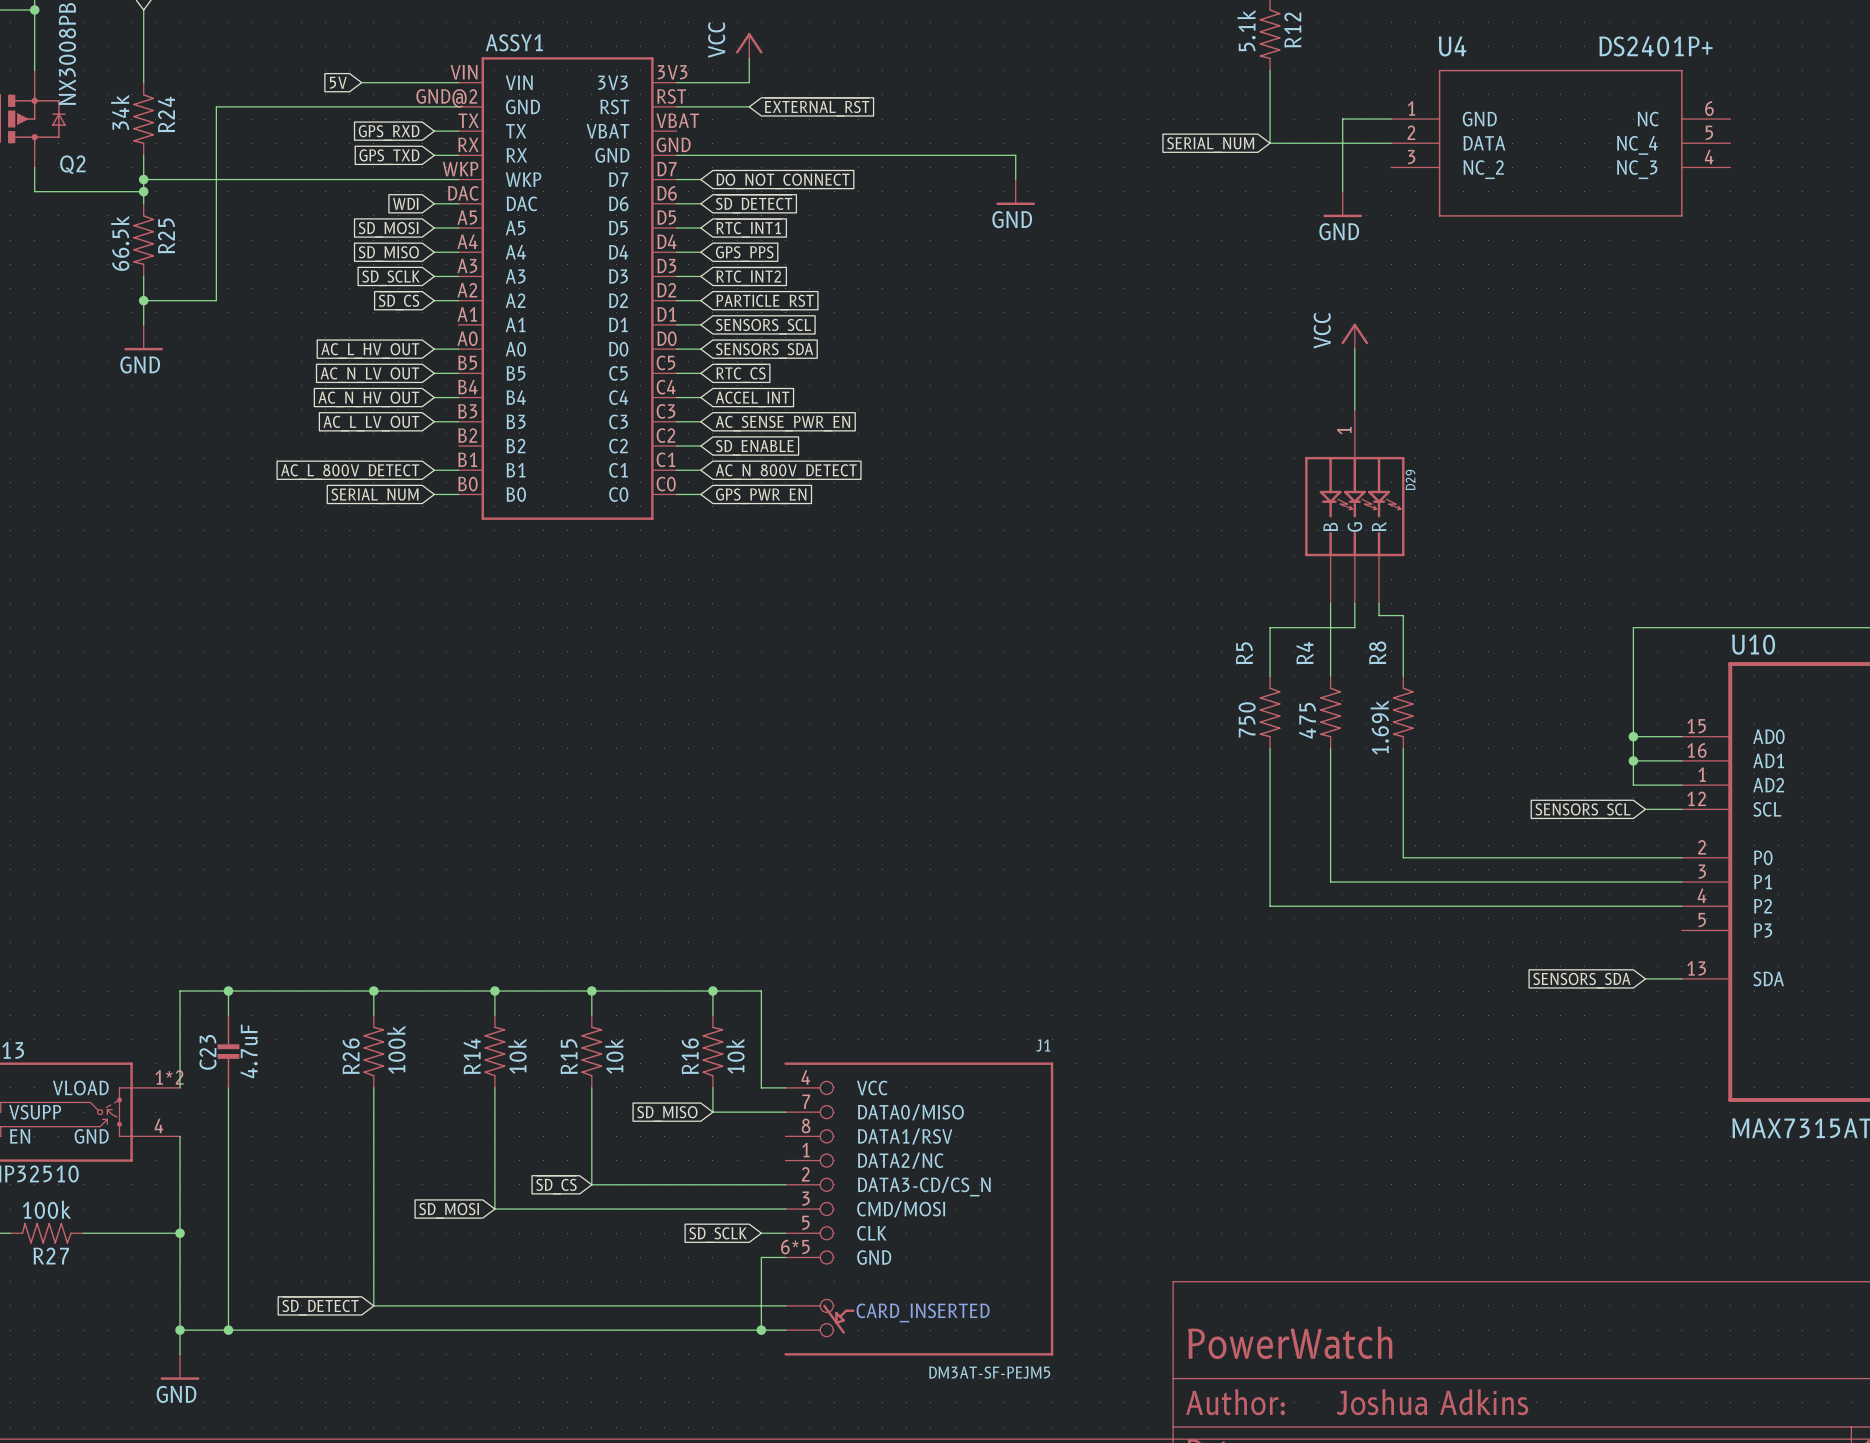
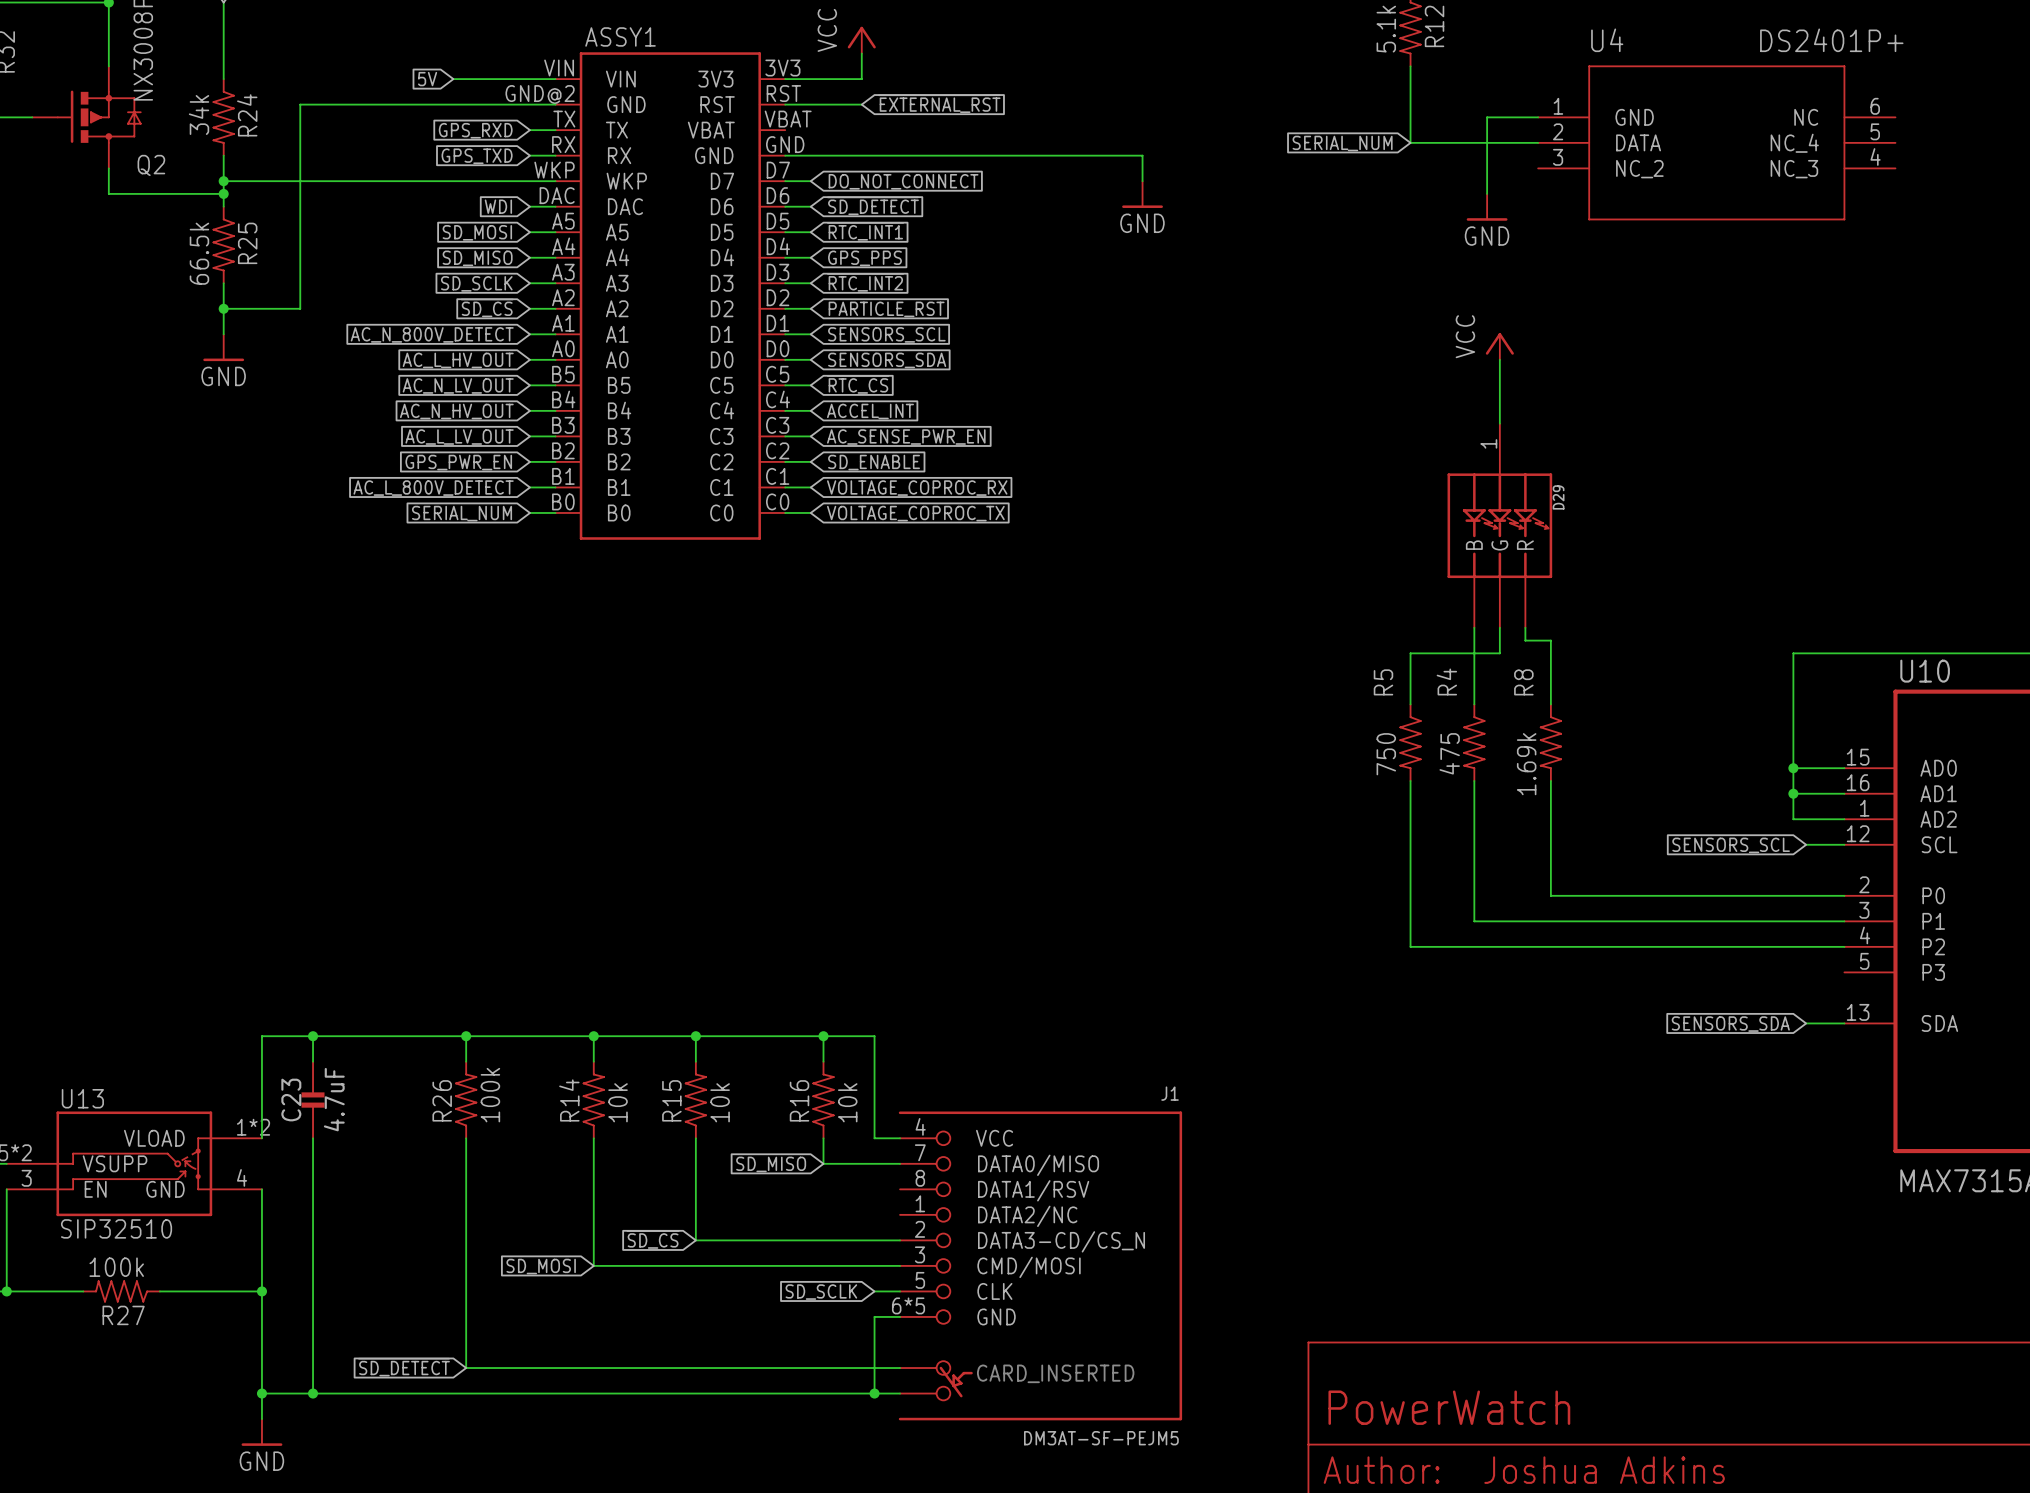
wire: none -> (529, 334) (555, 334)
global label: none -> AC_N_800V_DETECT (432, 334)
wire: none -> (529, 461) (555, 461)
global label: none -> GPS_PWR_EN (458, 462)
global label: AC_N_800V_DETECT (786, 472) -> VOLTAGE_COPROC_RX (917, 488)
global label: GPS_PWR_EN (761, 496) -> VOLTAGE_COPROC_TX (915, 513)

